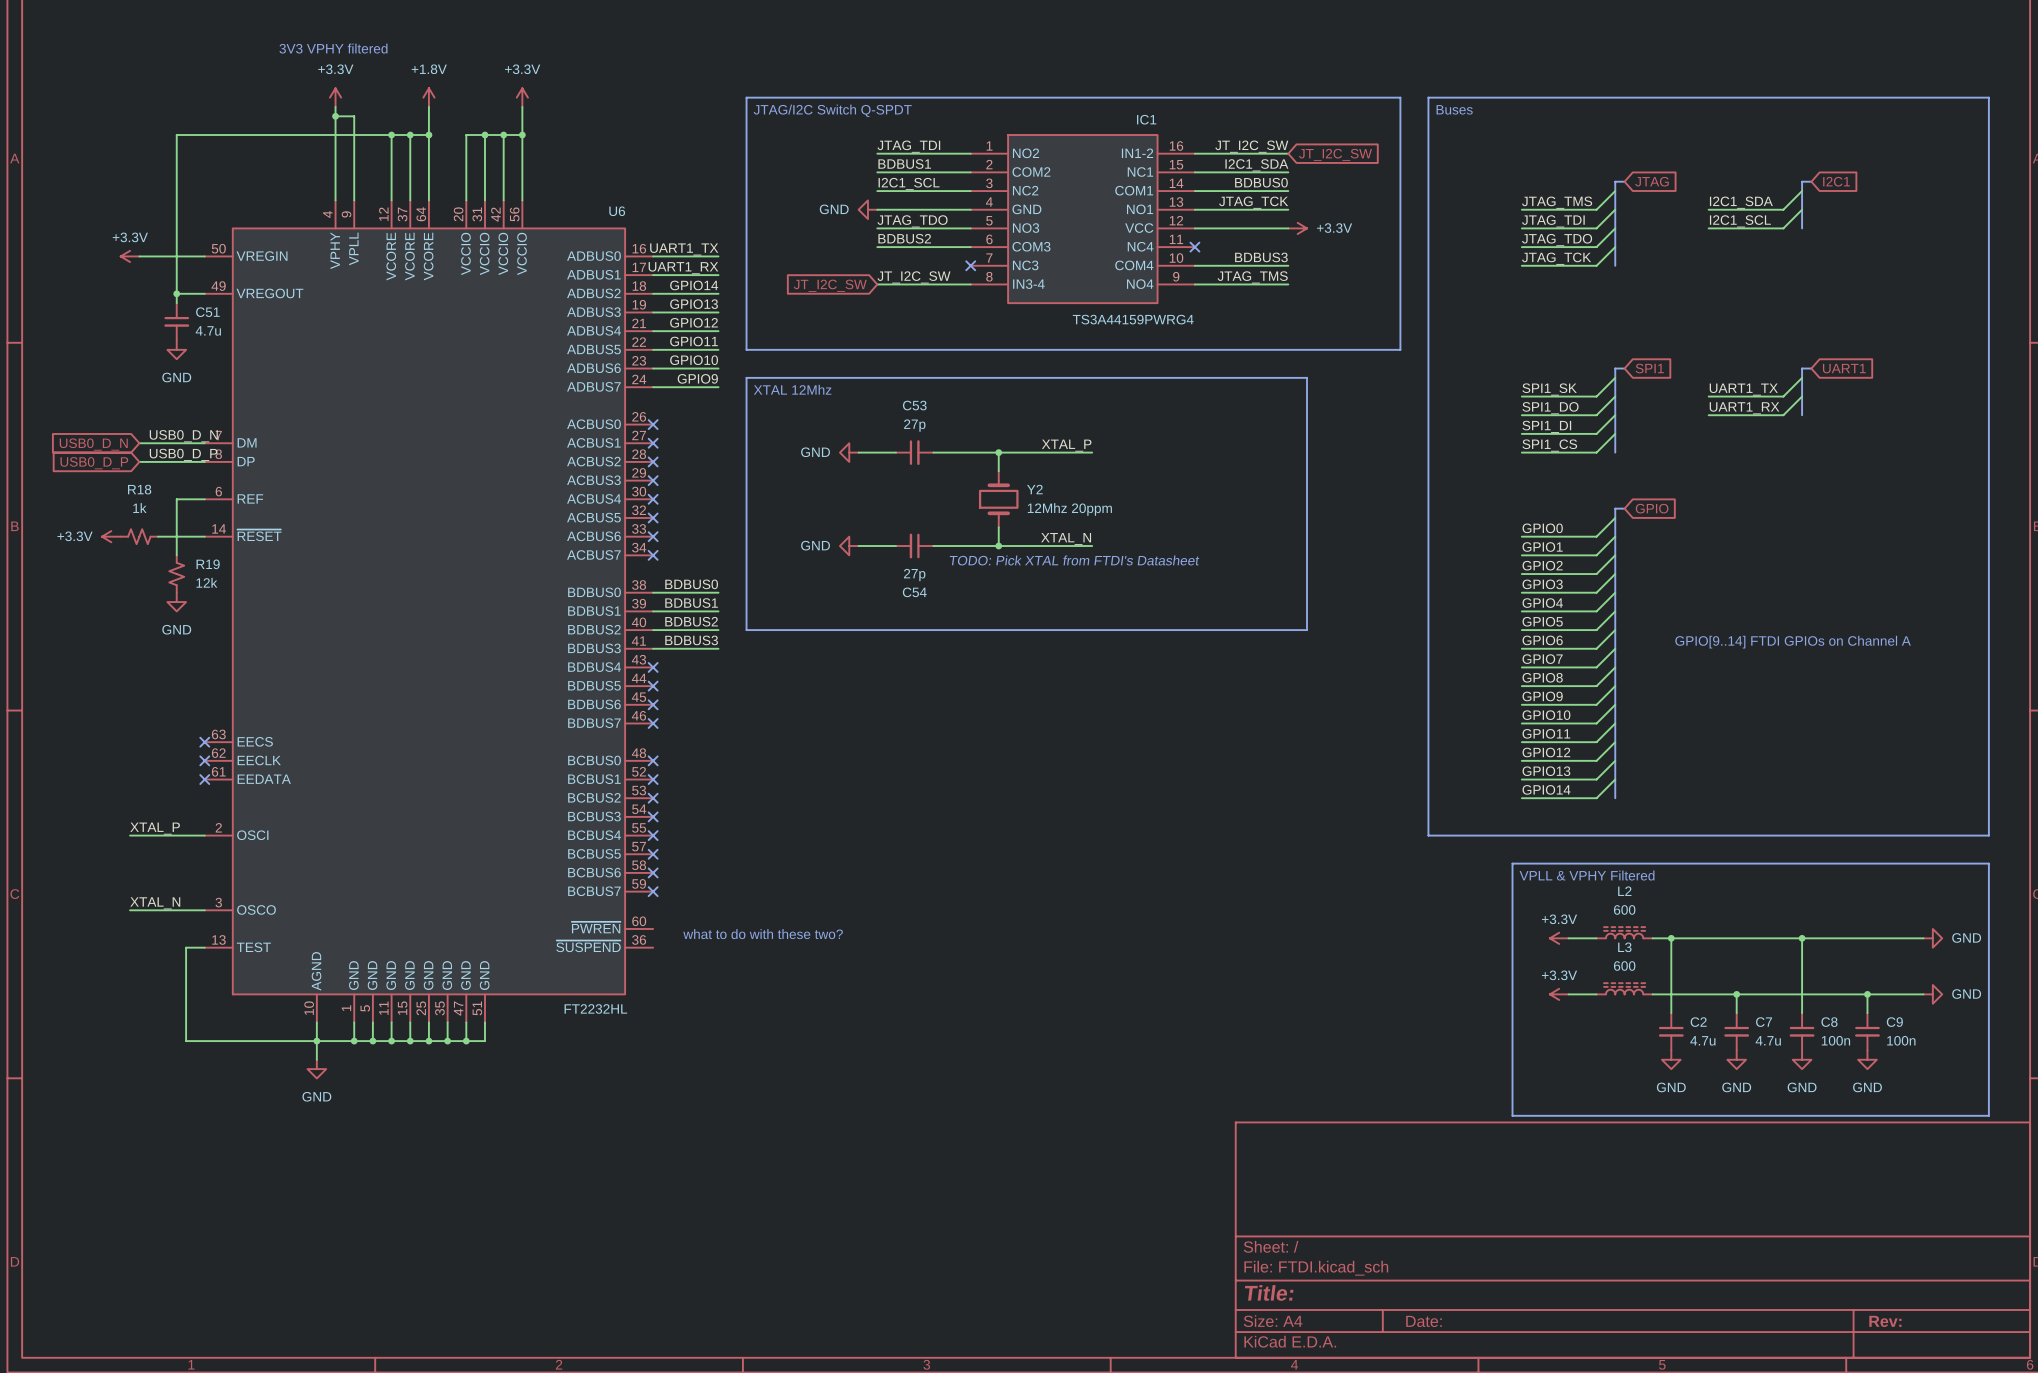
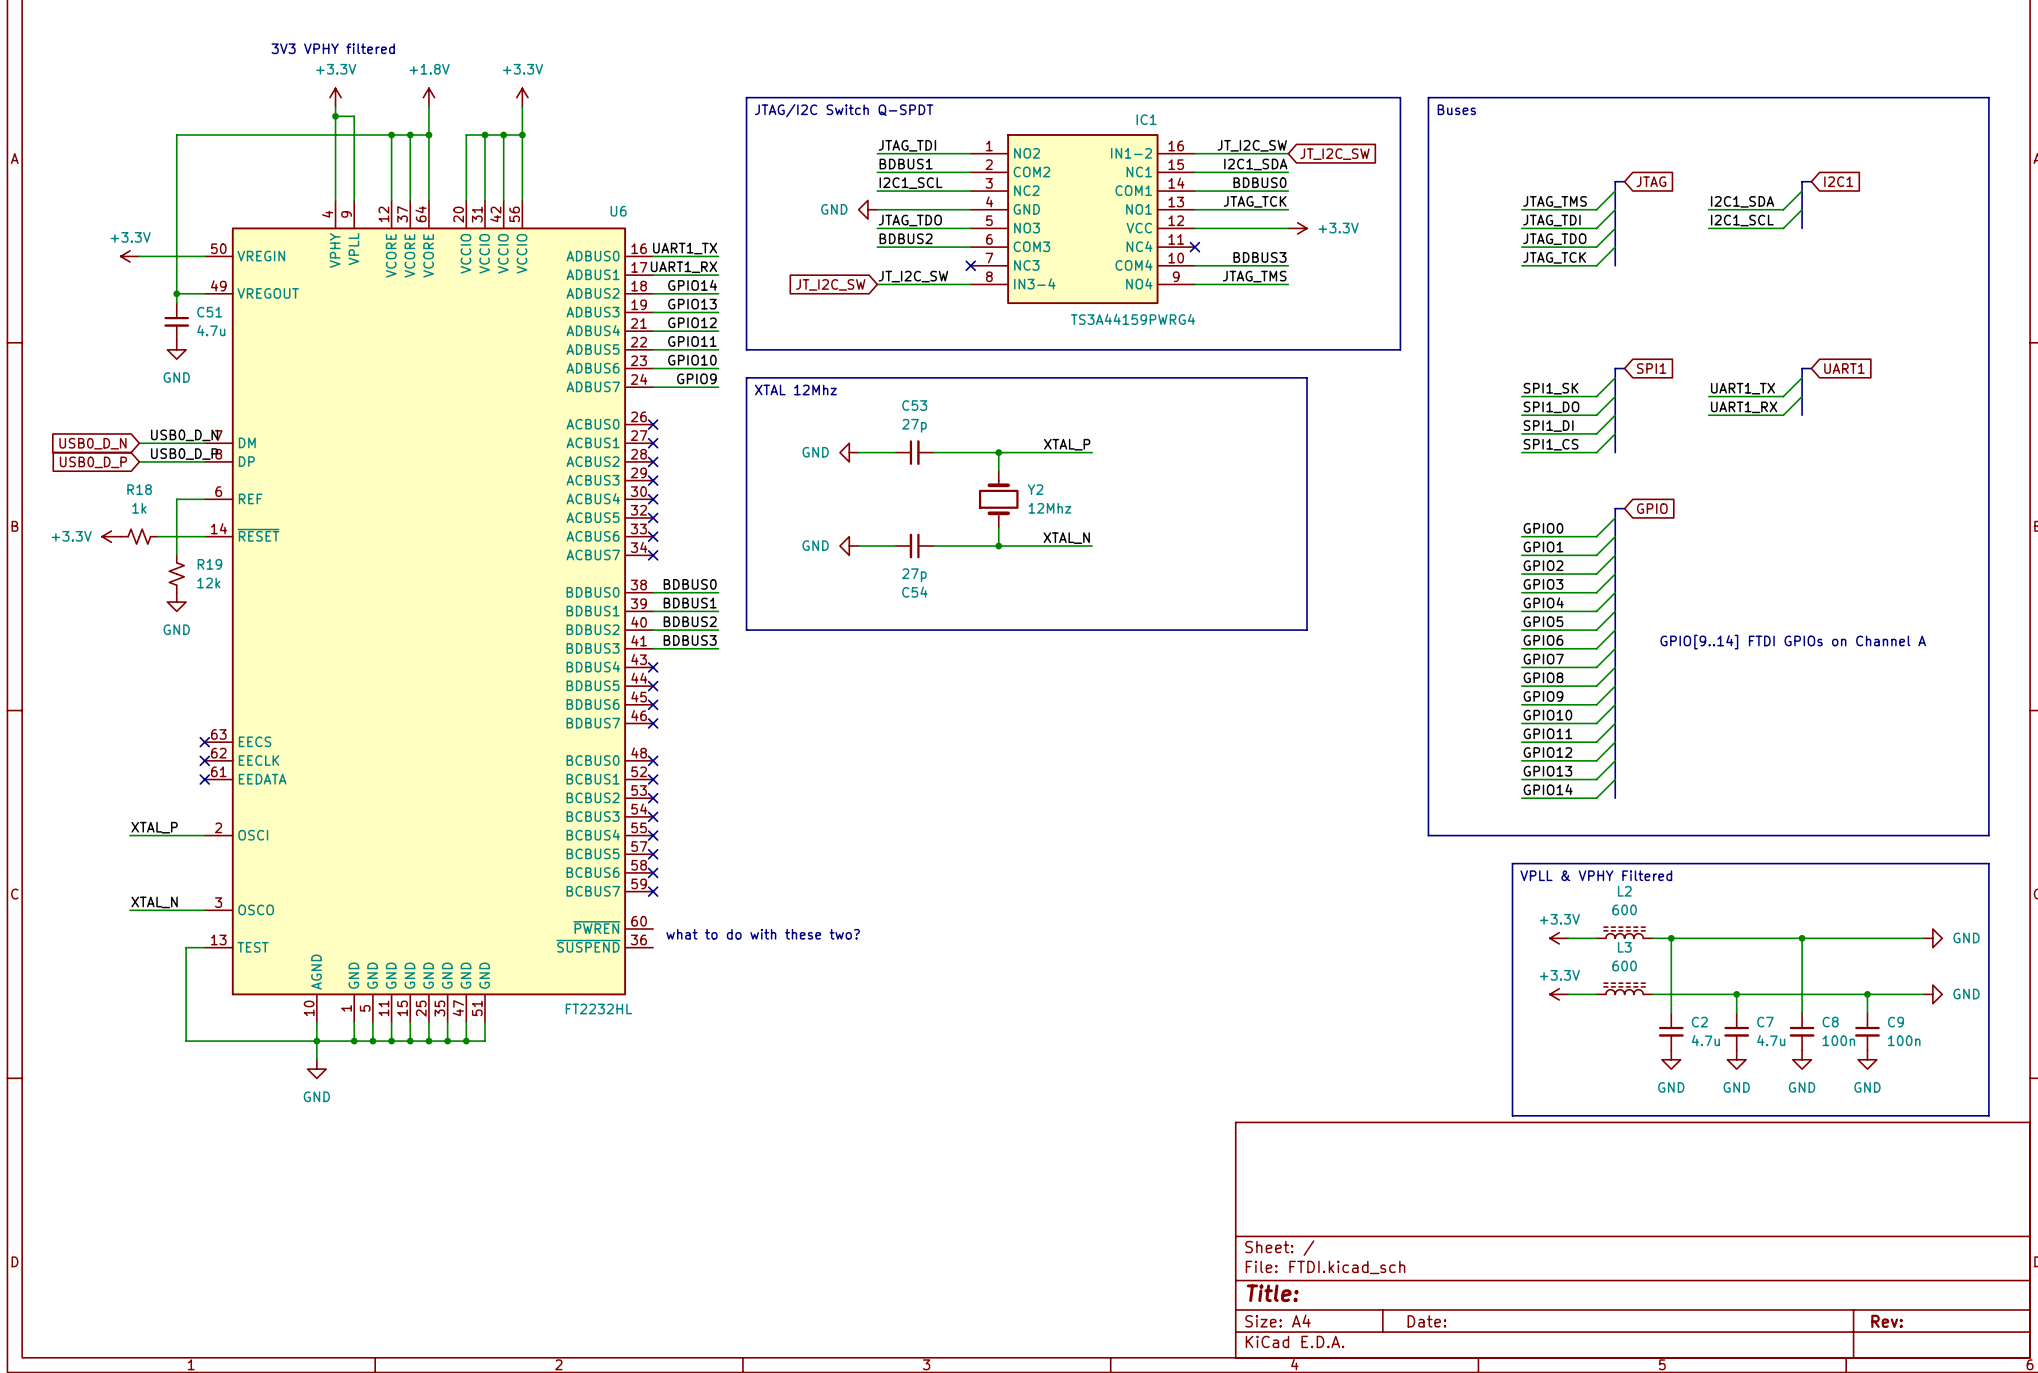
Y2 value: 12Mhz 20ppm (1069, 509) -> 12Mhz (1049, 508)
text: TODO: Pick XTAL from FTDI's Datasheet (1074, 560) -> none

